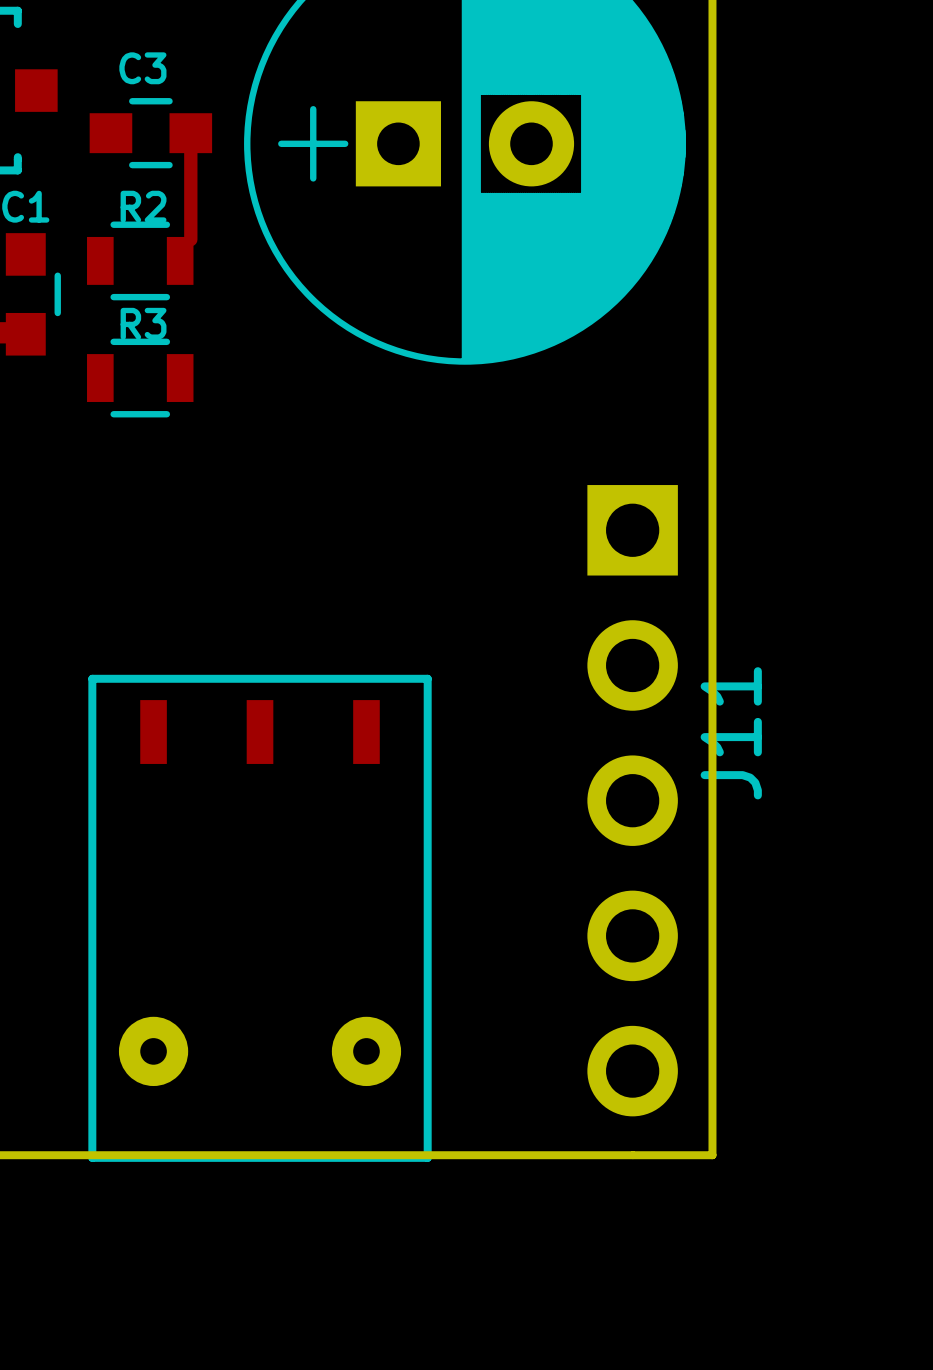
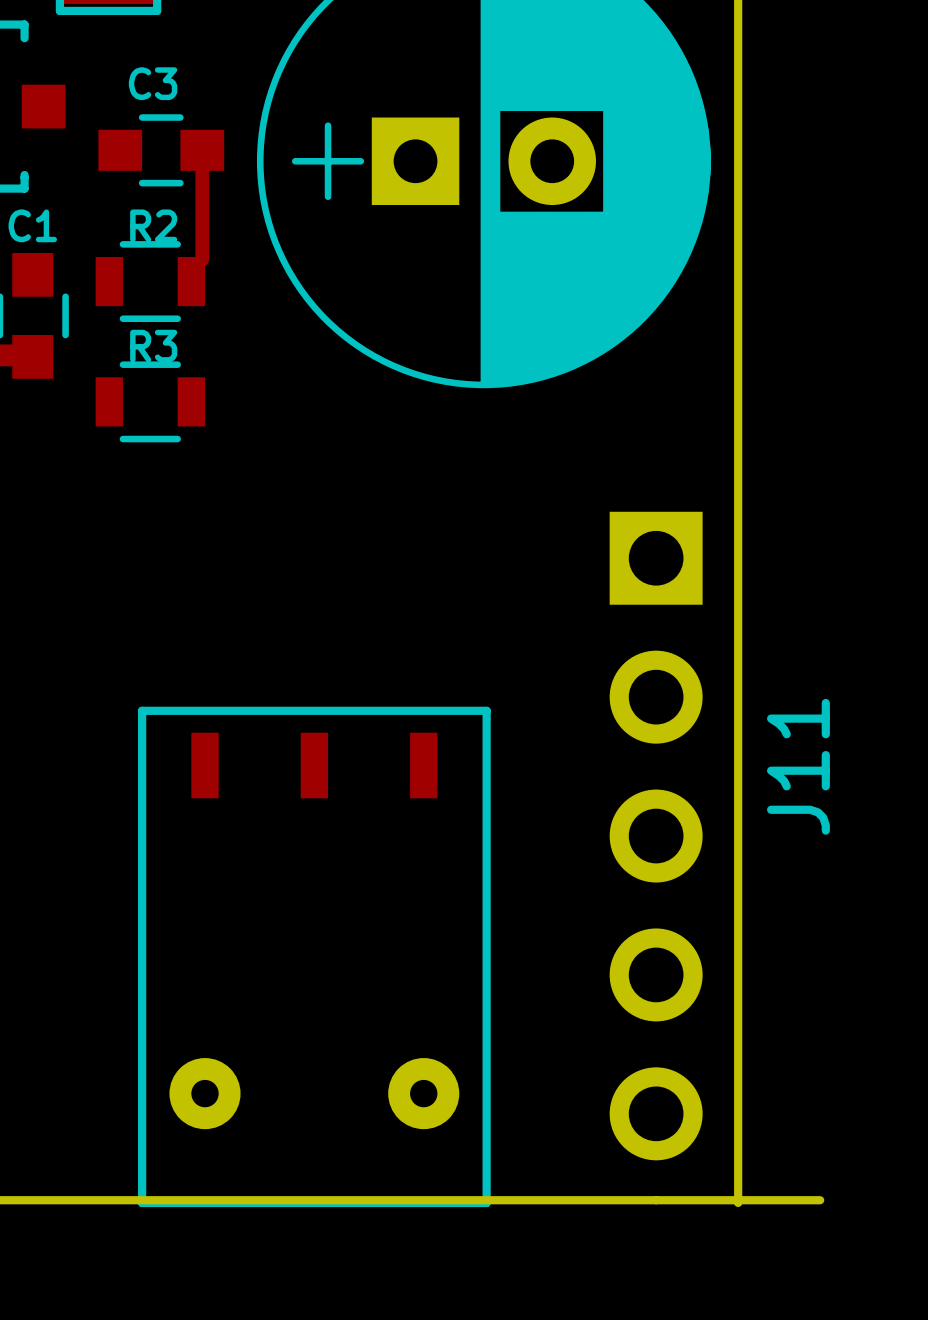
J11 position: (260, 918) -> (314, 956)
board edge: none -> (820, 1200) (738, 1200) (738, 1202)

